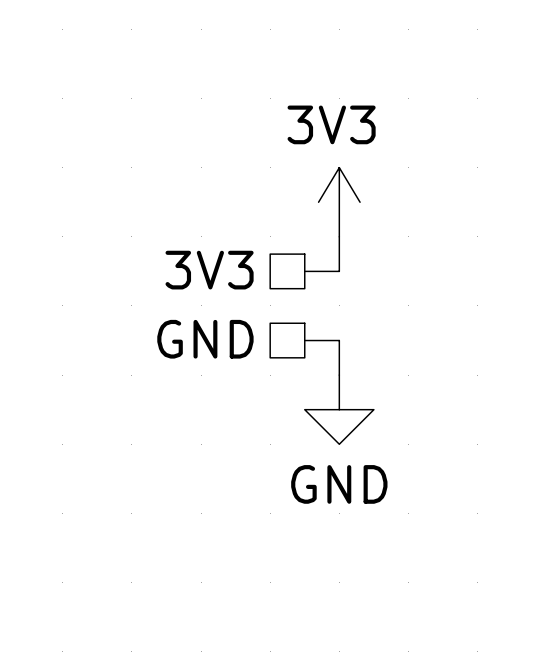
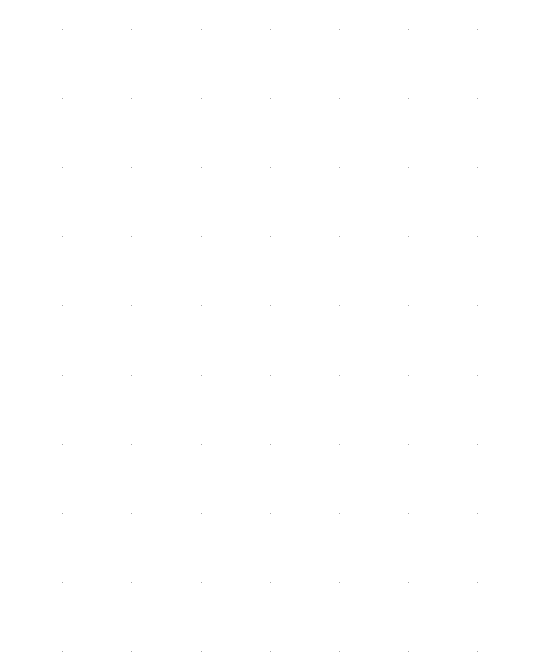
power symbol: 3V3 (339, 202) -> none
wire: (339, 236) (339, 271) (304, 271) -> none
hierarchical label: 3V3 (209, 270) -> none
hierarchical label: GND (205, 339) -> none
wire: (304, 340) (339, 340) (339, 375) -> none
power symbol: GND (339, 409) -> none

